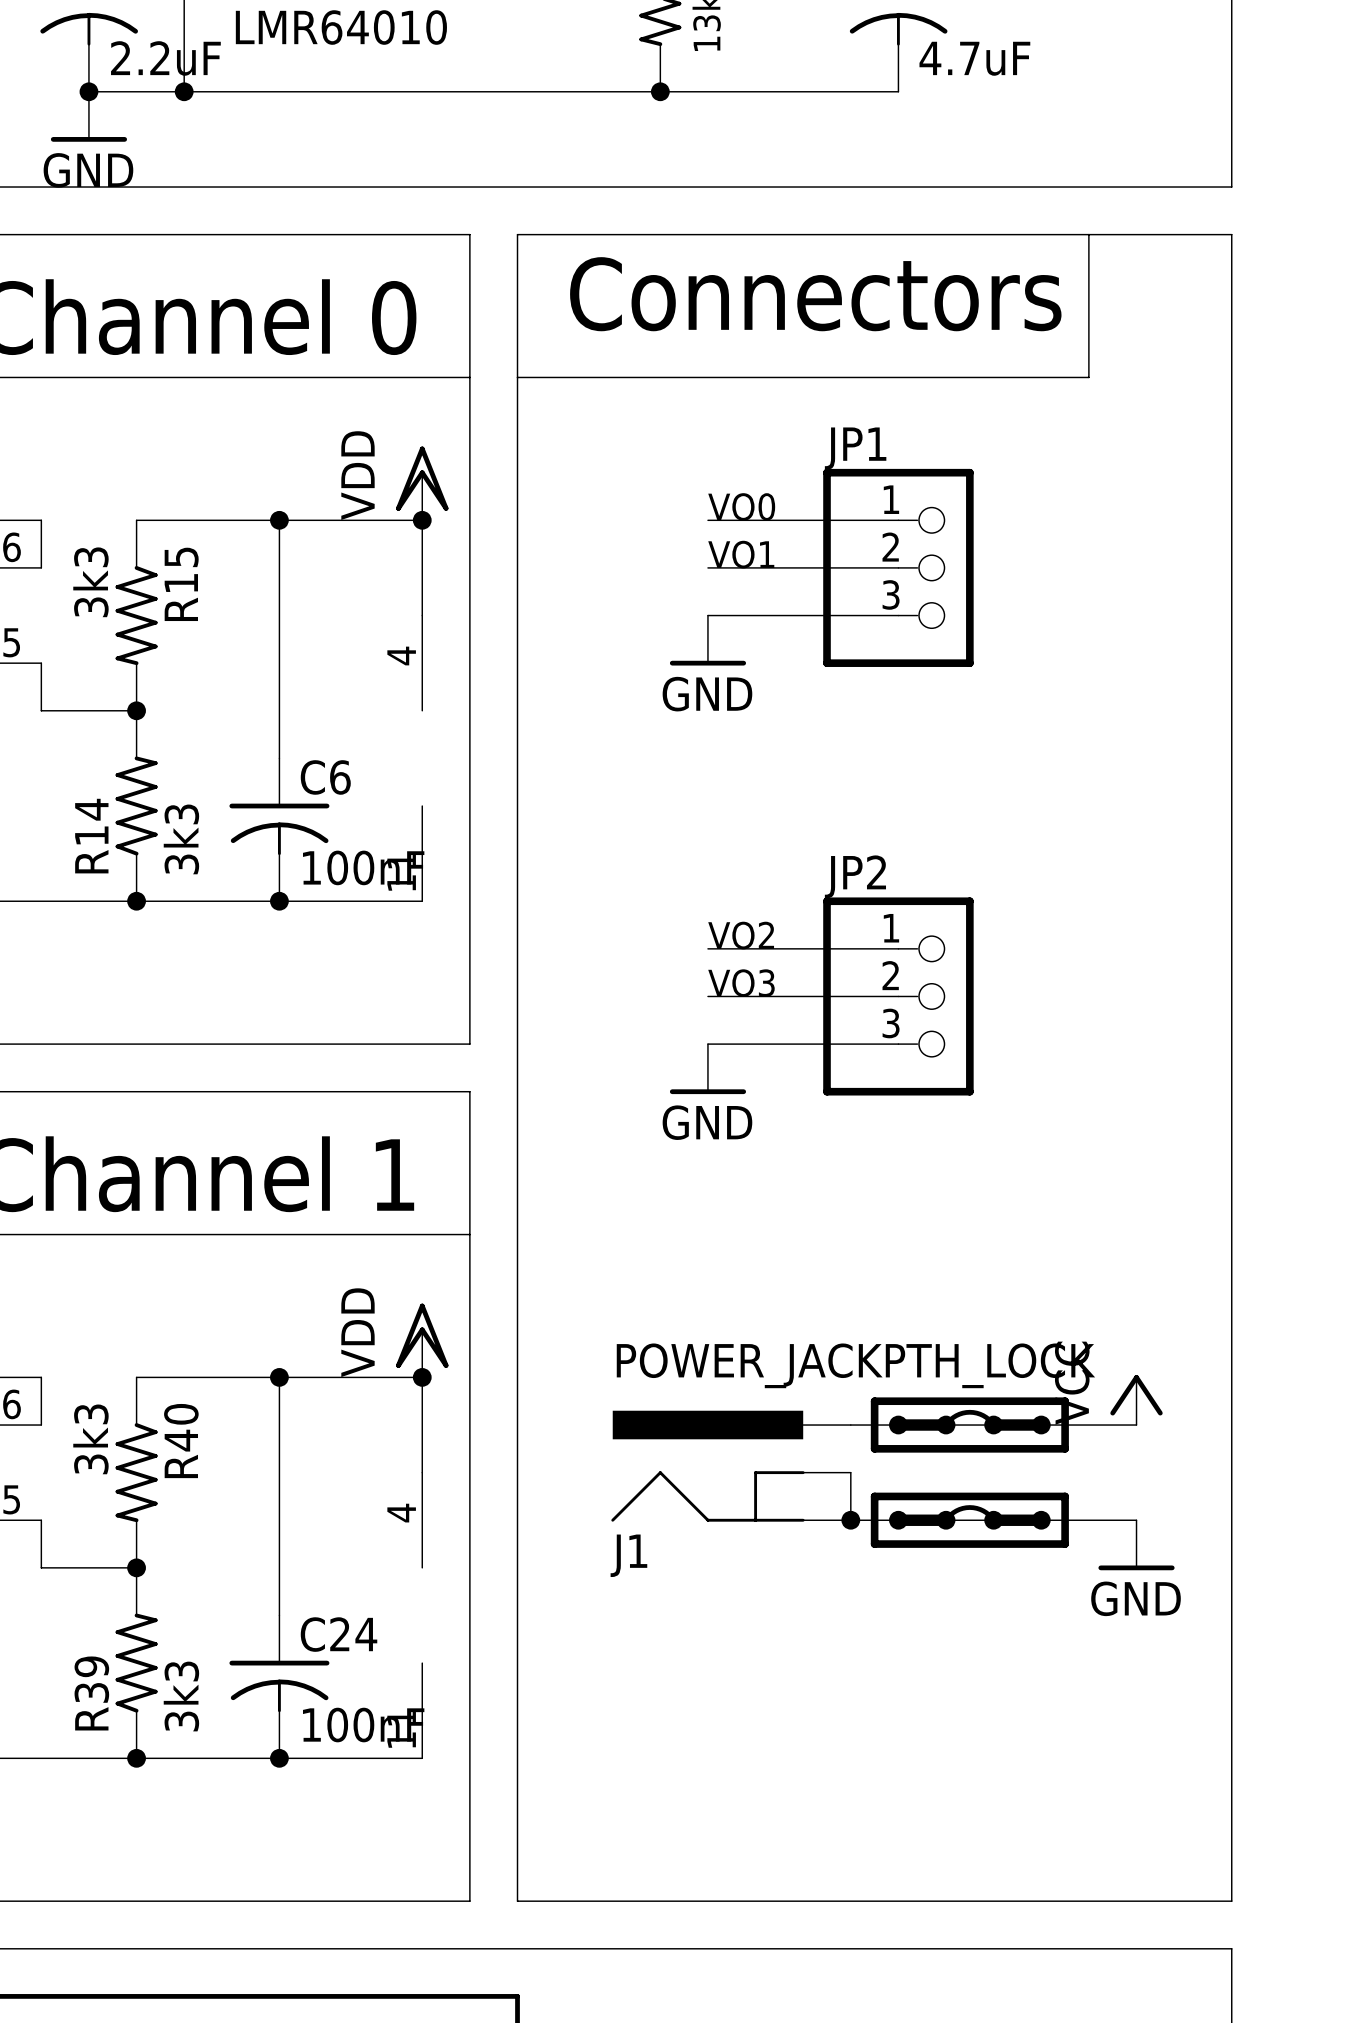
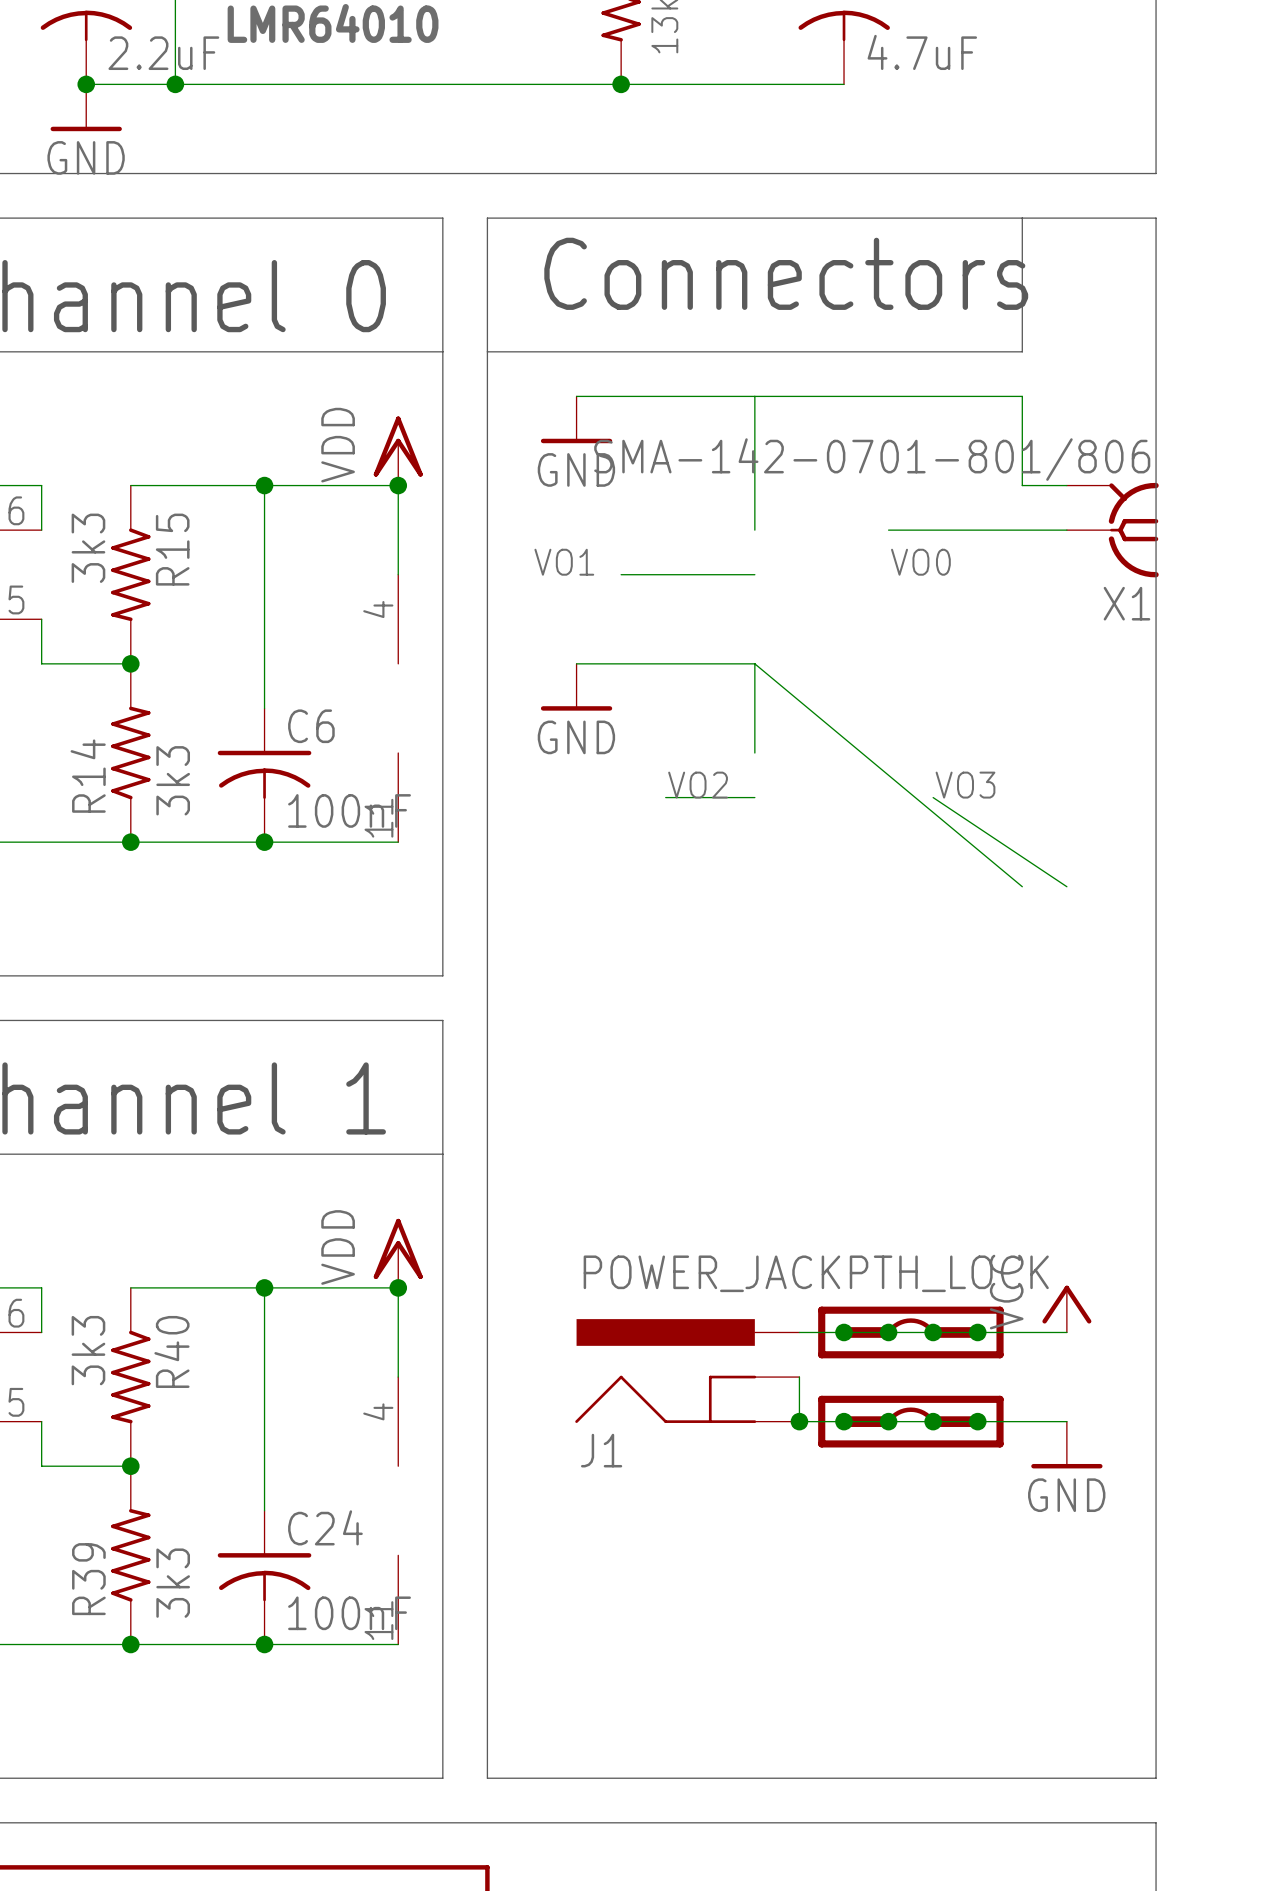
wire: none -> (576, 396) (1022, 396) (1022, 485) (1066, 485)
wire: none -> (754, 396) (754, 530)
power symbol: none -> GND (576, 419)
label position: VO0 (741, 507) -> VO0 (920, 562)
wire: (707, 520) (898, 520) -> (888, 530) (1066, 530)
label position: VO1 (741, 554) -> VO1 (564, 562)
wire: (707, 567) (898, 567) -> (576, 663) (754, 663)
JP1: (898, 567) -> none
X1: none -> SMA-142-0701-801/806 (1112, 530)
wire: none -> (621, 574) (665, 574)
wire: (803, 615) (898, 615) -> (665, 797) (754, 797)
power symbol: GND (707, 640) -> none
wire: none -> (754, 663) (754, 753)
wire: none -> (754, 663) (1022, 886)
power symbol: none -> GND (576, 687)
wire: none -> (933, 797) (1066, 886)
label position: VO2 (741, 935) -> VO2 (698, 785)
wire: (707, 948) (898, 948) -> none
label position: VO3 (741, 983) -> VO3 (965, 785)
wire: (707, 996) (898, 996) -> none
JP2: (898, 996) -> none
wire: (707, 1044) (898, 1044) -> none
power symbol: GND (707, 1069) -> none

